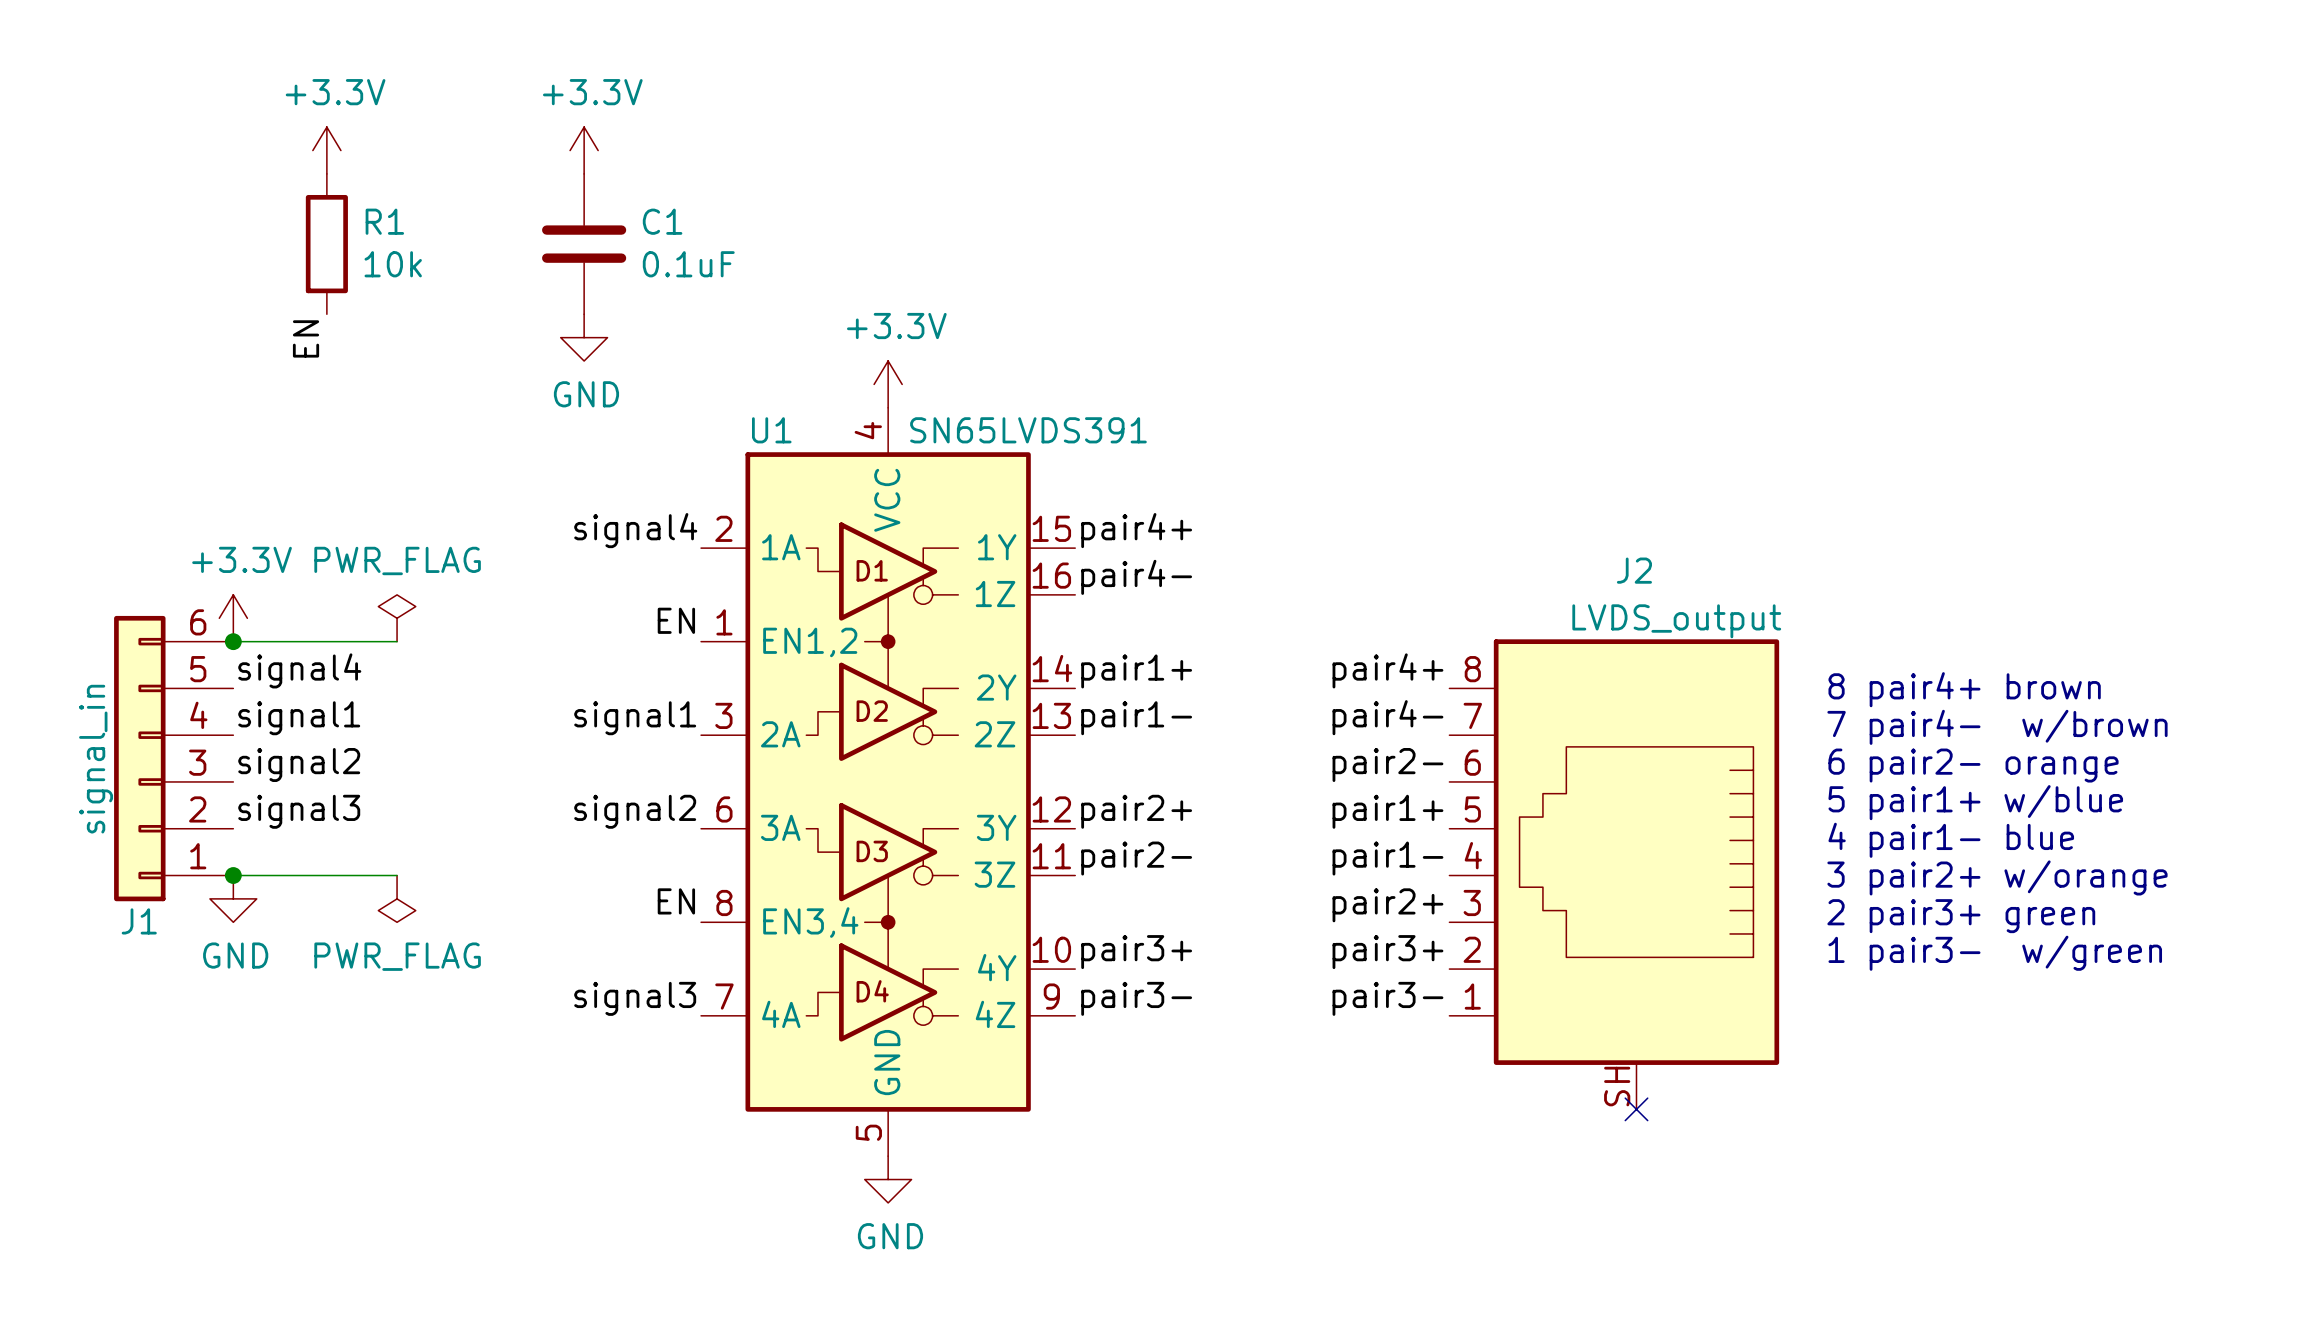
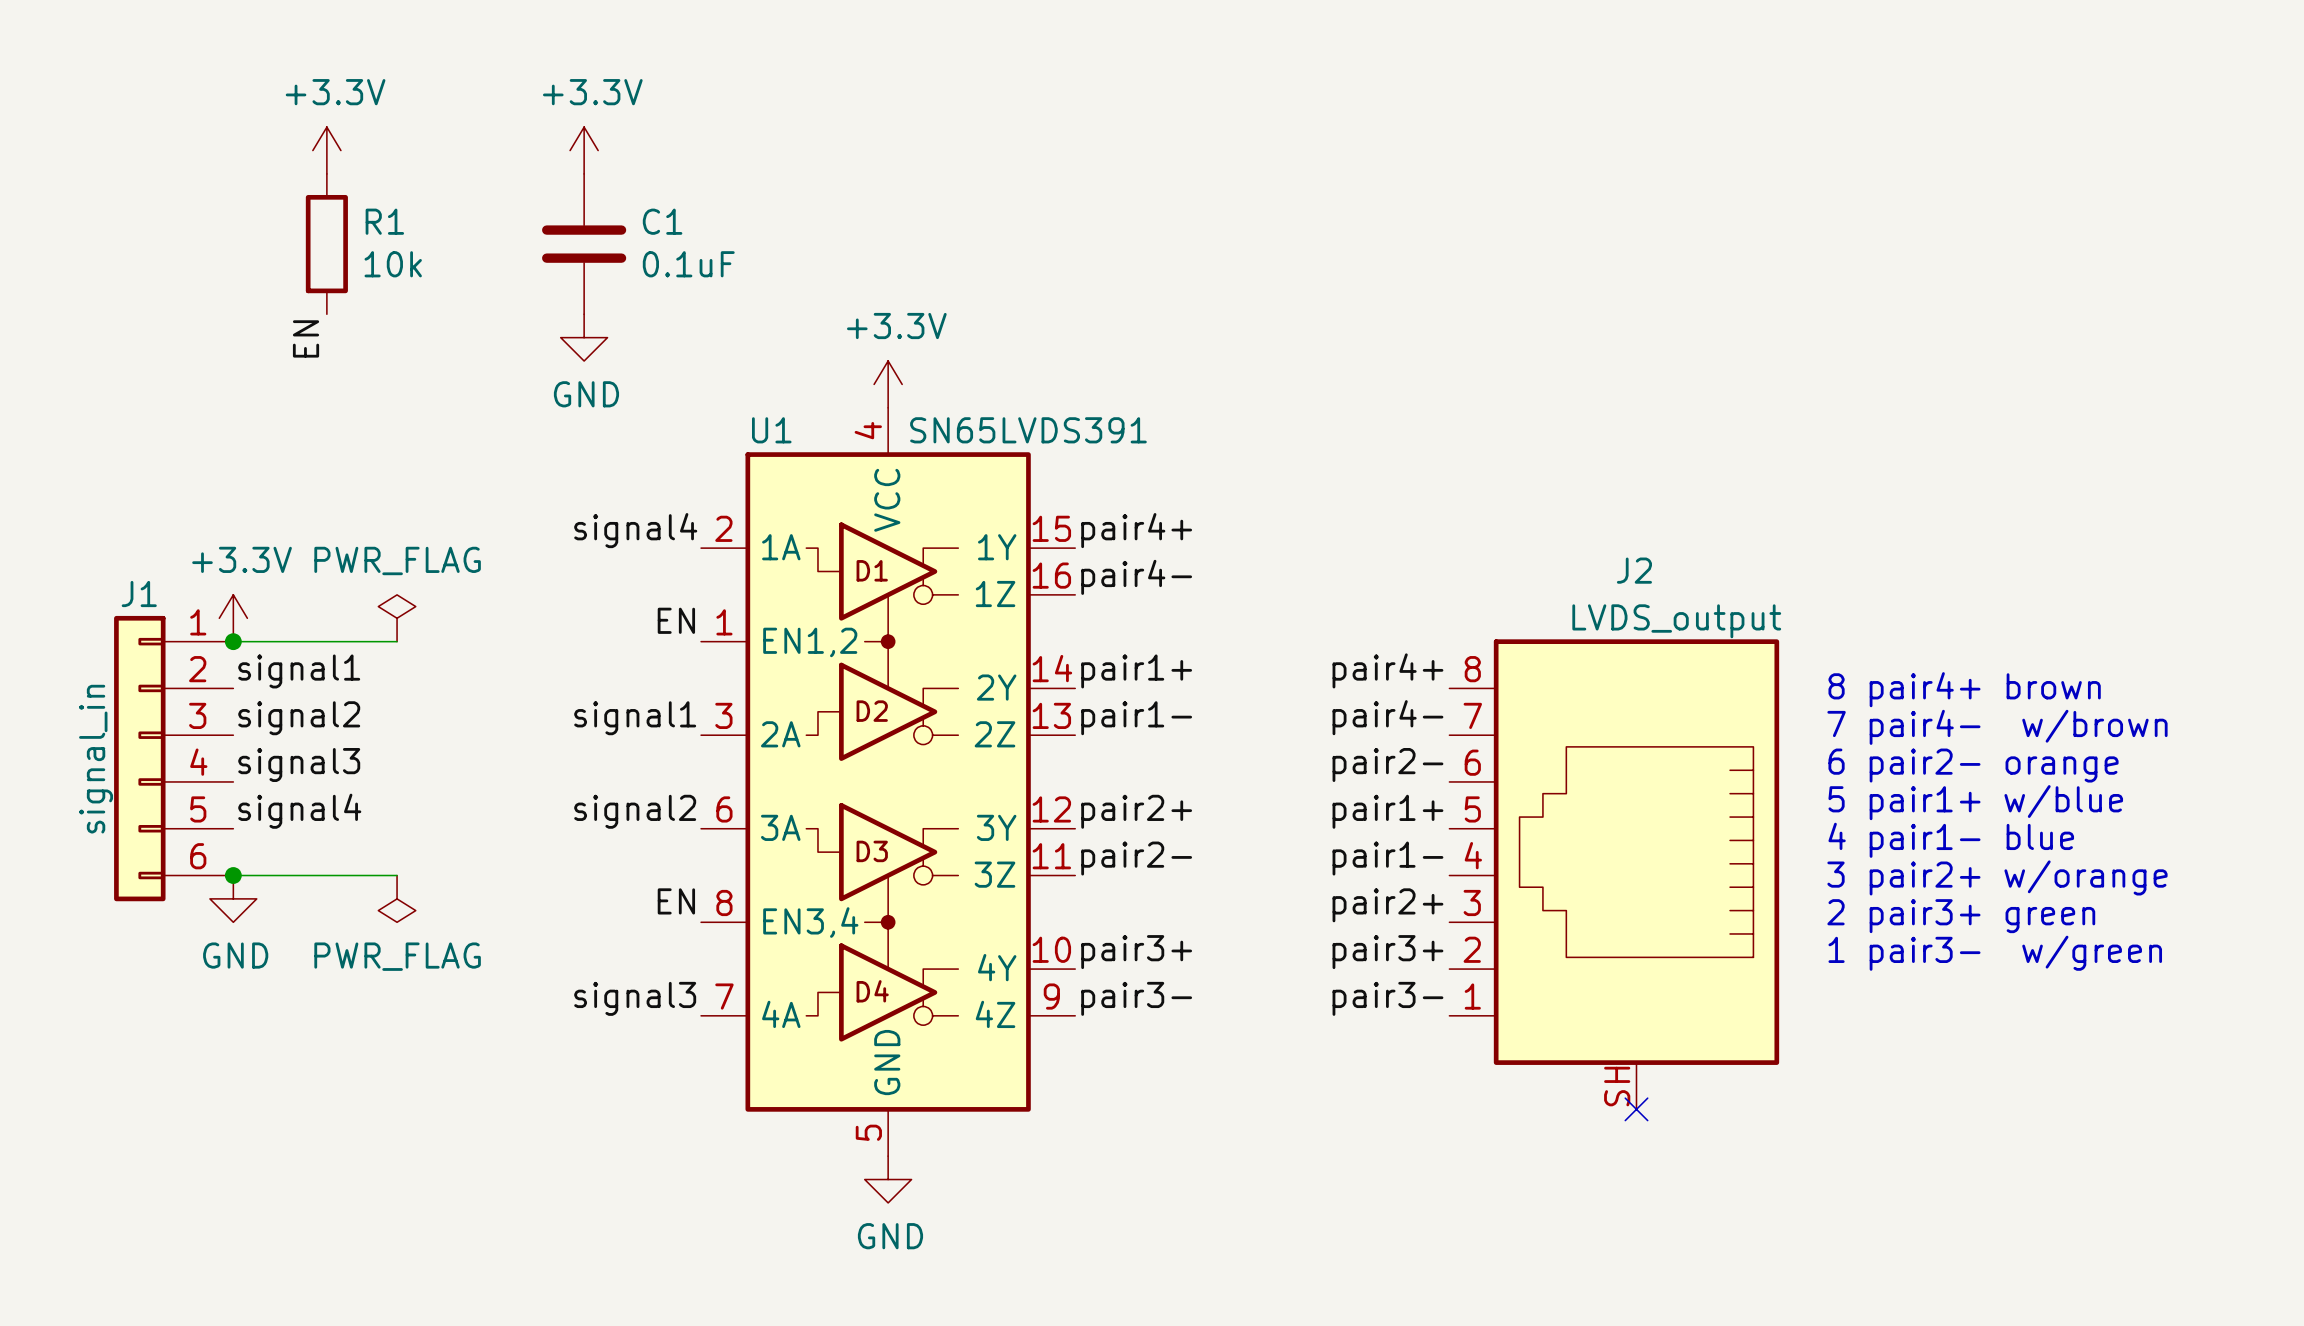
label: signal4 (299, 670) -> signal1 (299, 671)
label: signal1 (299, 718) -> signal2 (299, 718)
J1 flip: as is (139, 758) -> up-down (139, 758)
label: signal2 (299, 765) -> signal3 (299, 765)
label: signal3 (299, 811) -> signal4 (299, 811)

